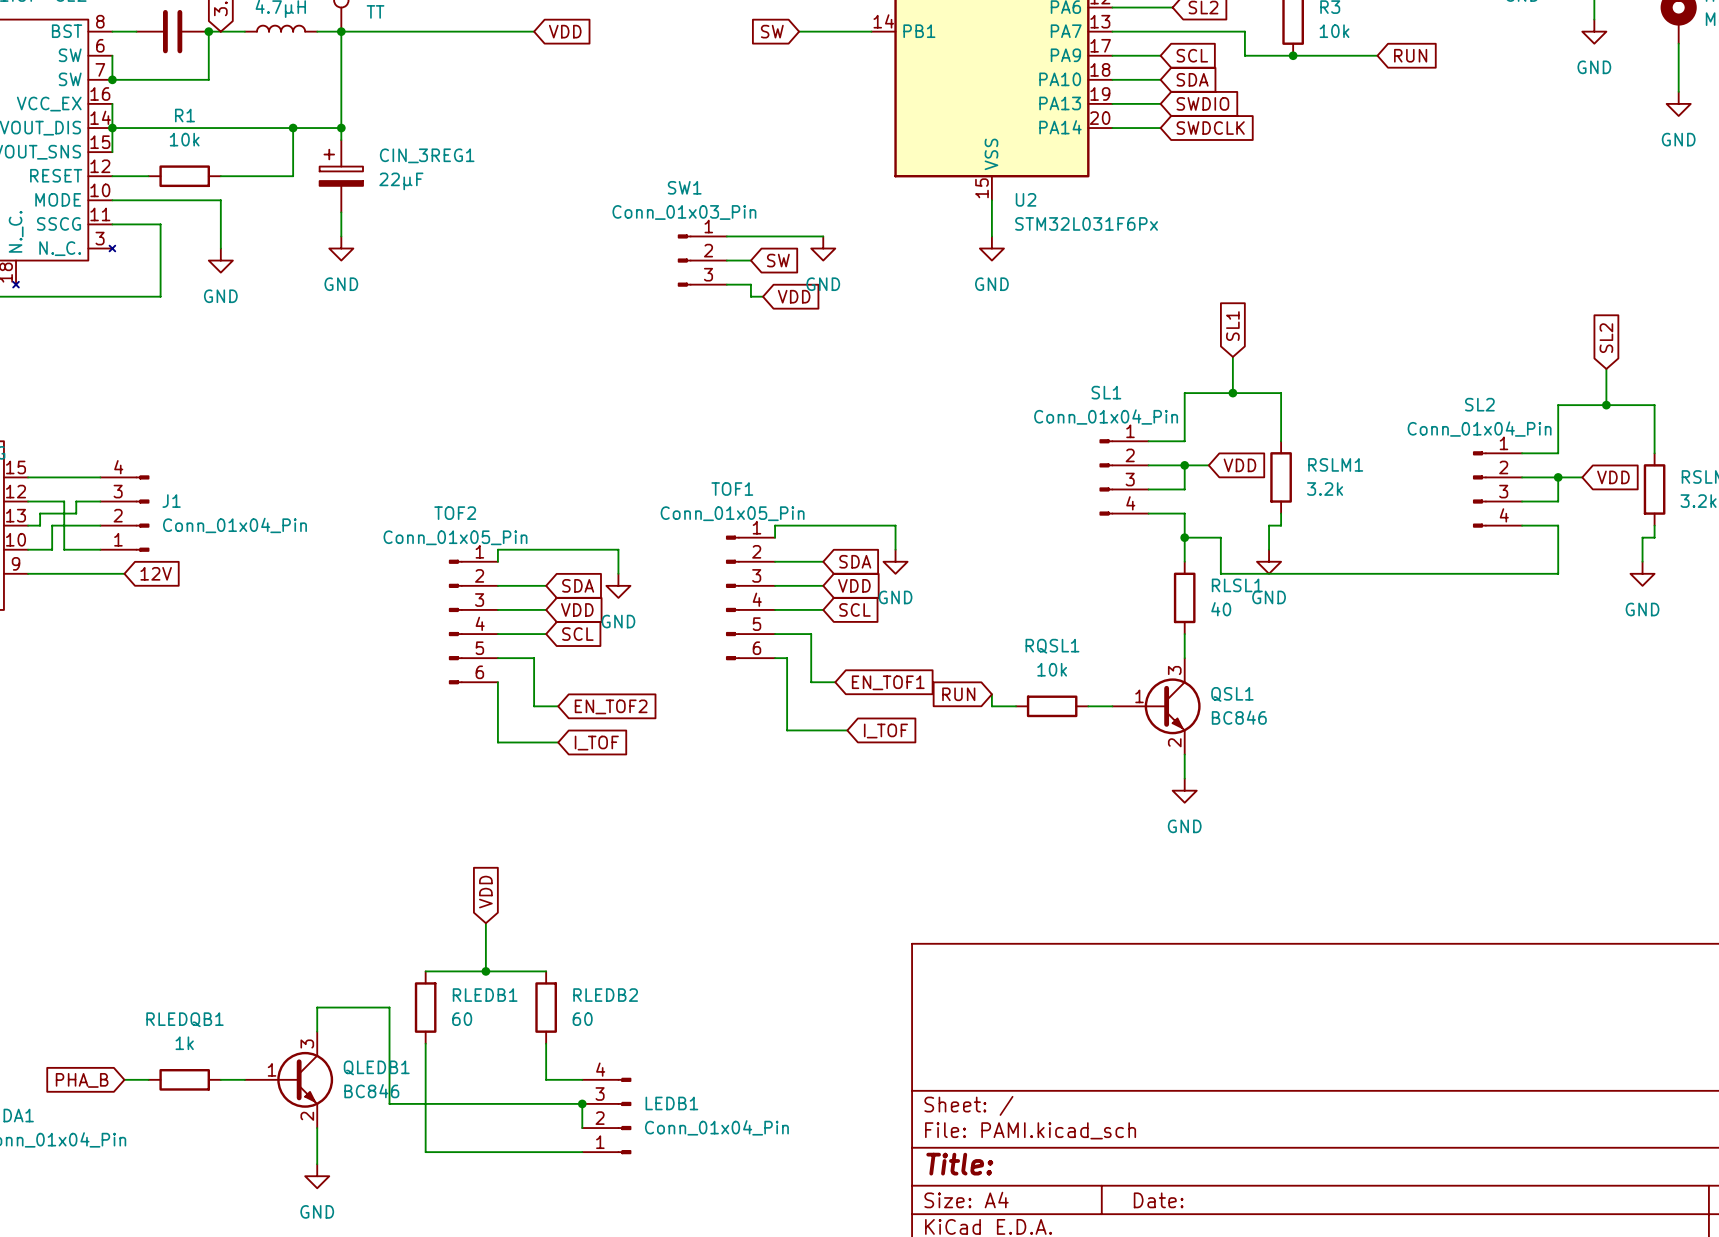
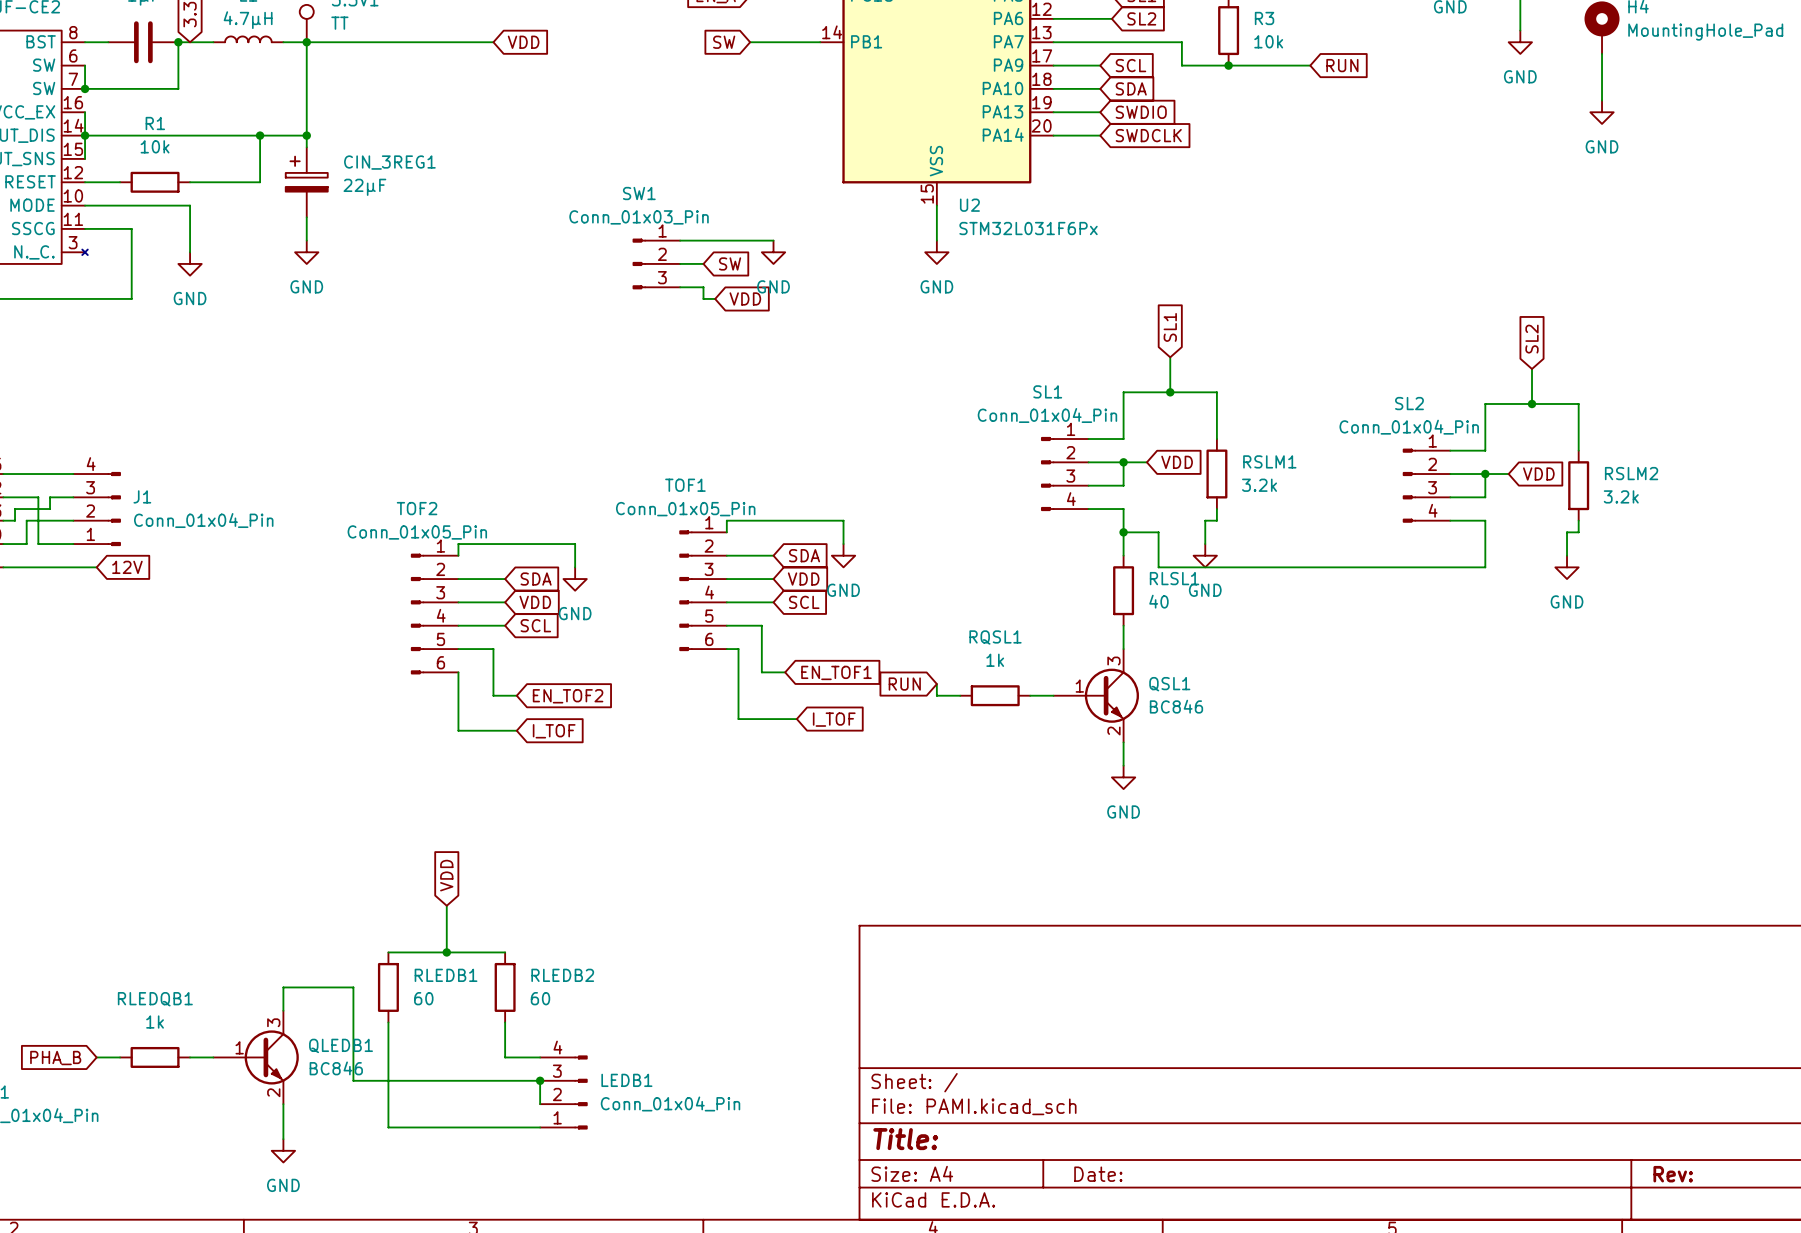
RQSL1 value: 10k (1052, 669) -> 1k (995, 660)

